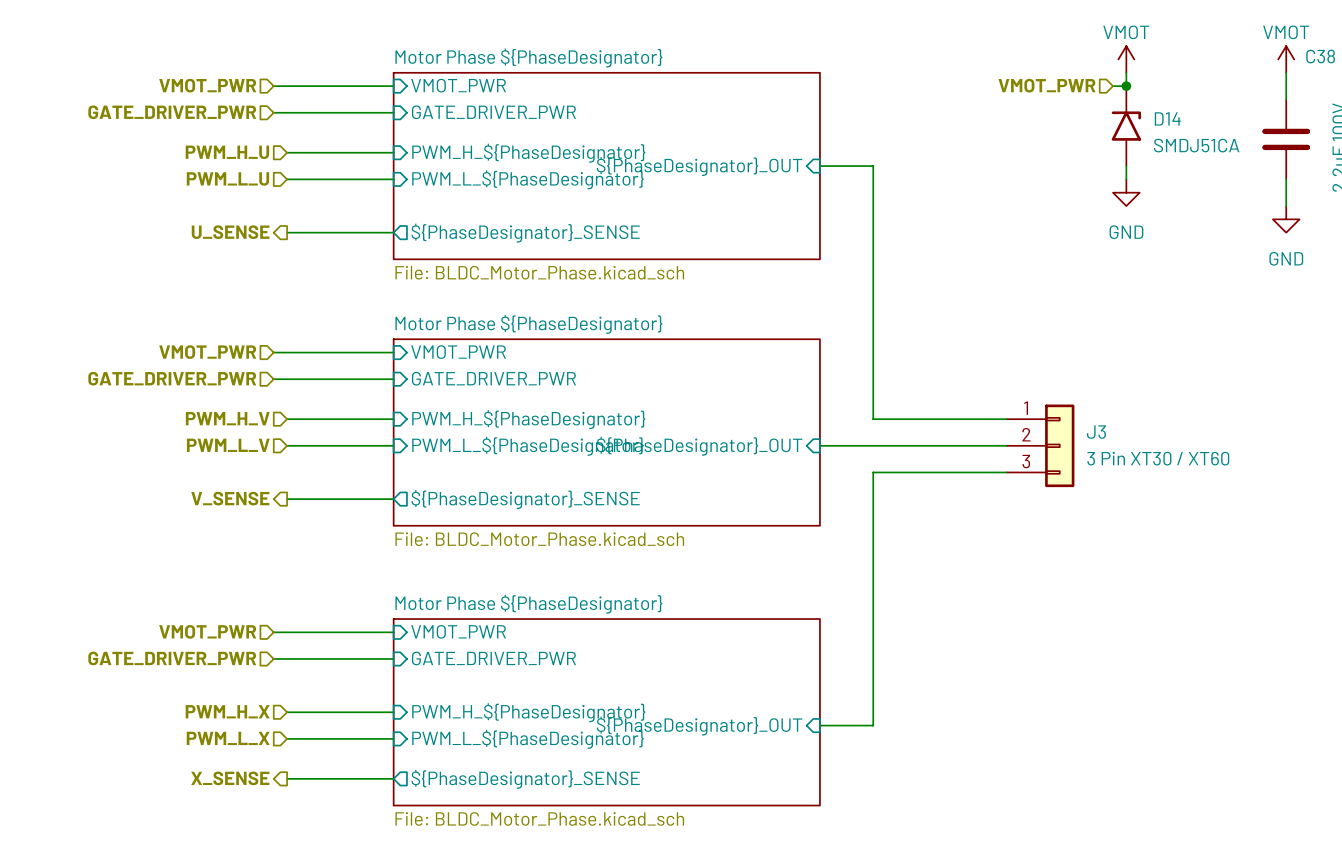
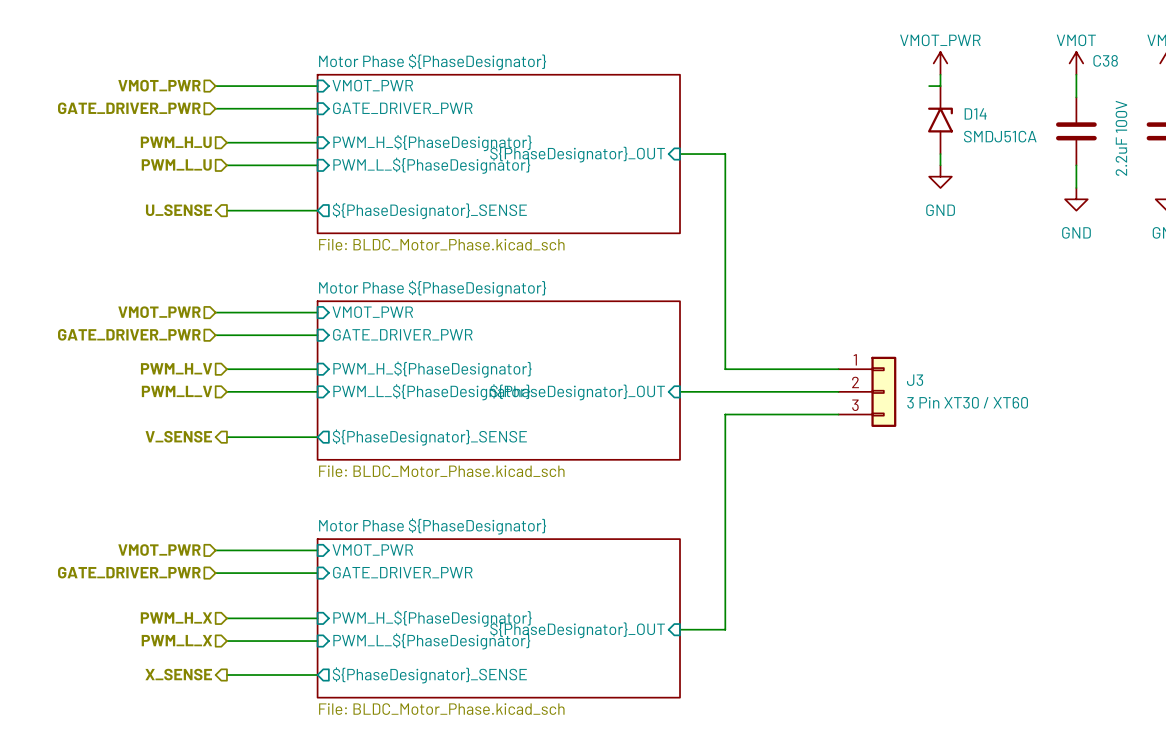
power symbol: VMOT (1126, 59) -> VMOT_PWR (940, 63)
hierarchical label: VMOT_PWR (1047, 85) -> none
junction: (1126, 86) -> none

